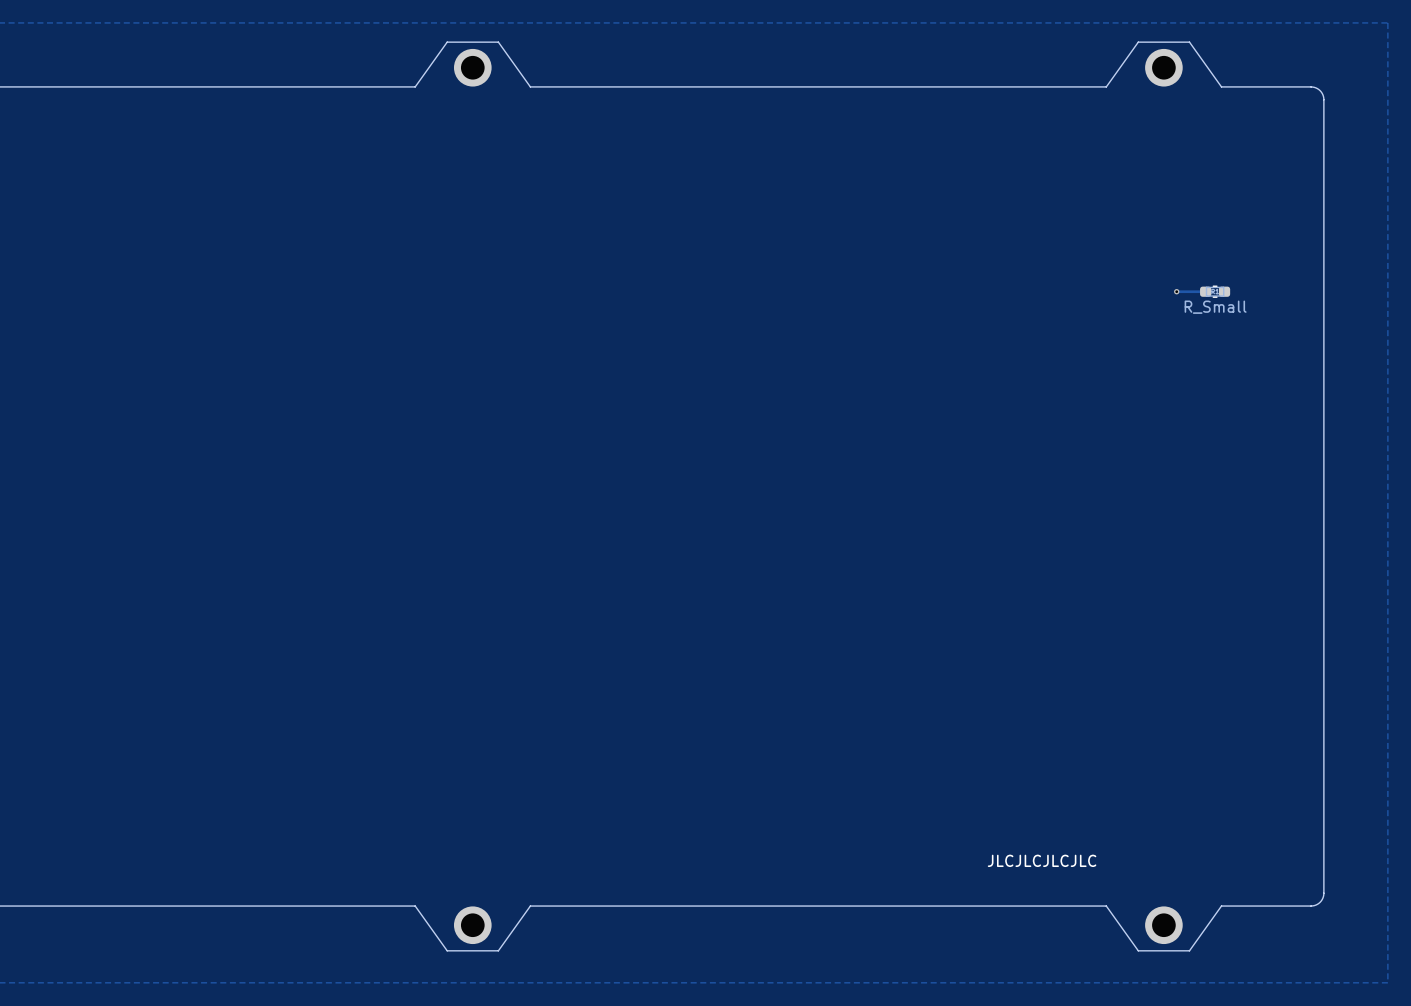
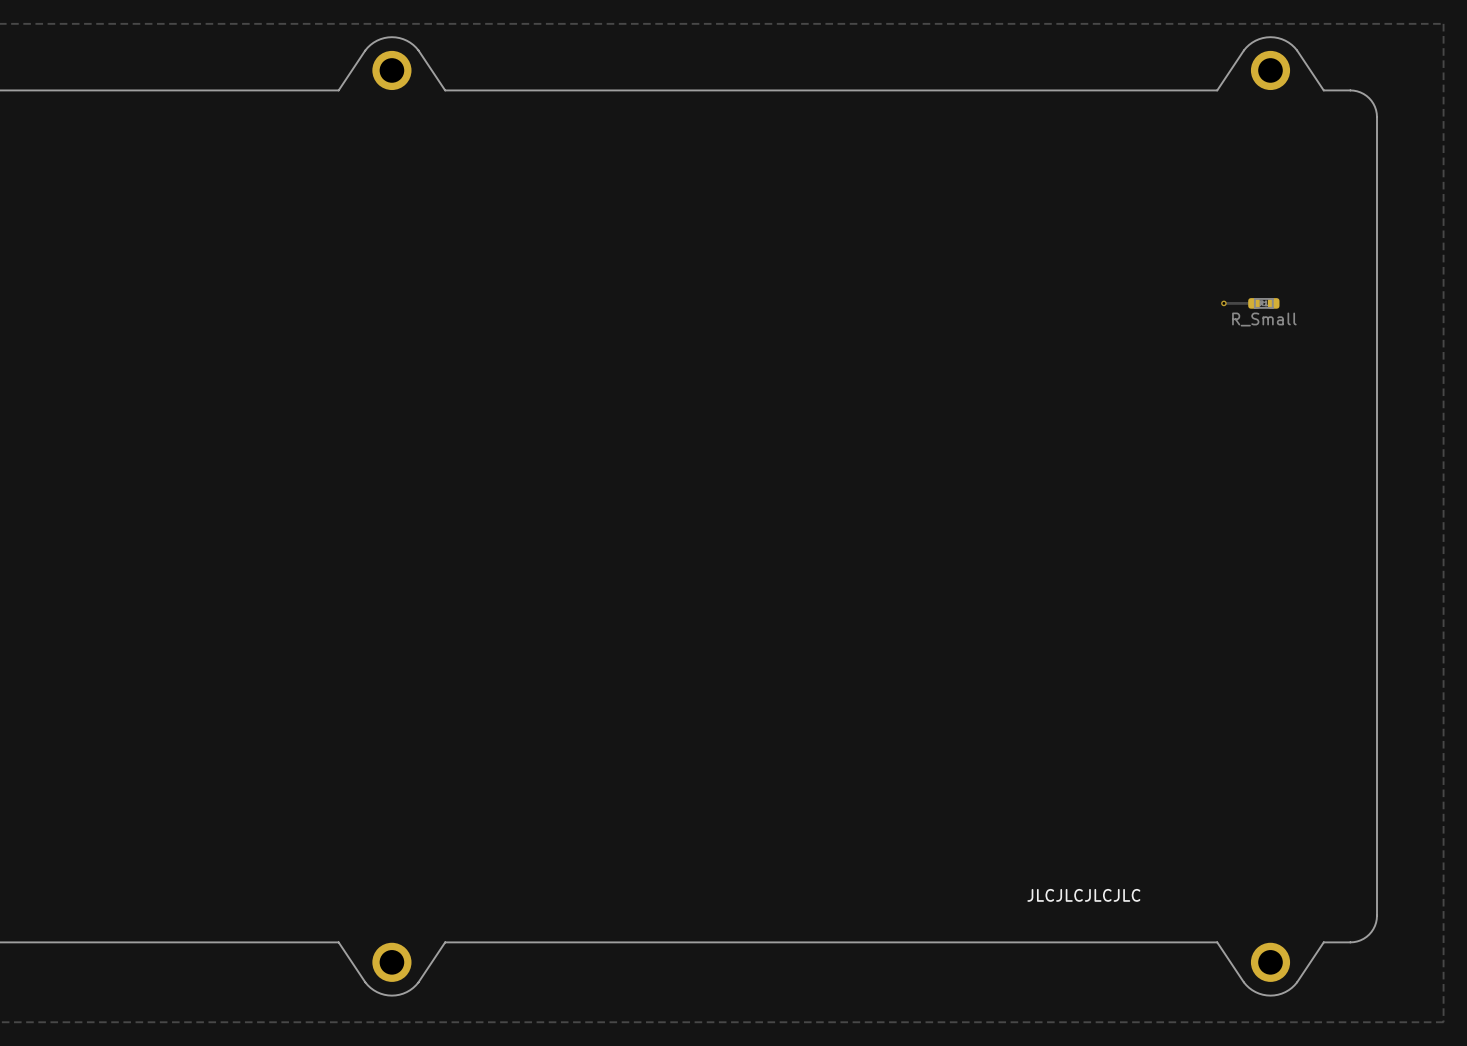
part position: (472, 67) -> (391, 70)
part position: (1163, 67) -> (1270, 70)
board edge: (325, 86) (415, 86) (447, 42) (498, 42) (530, 86) -> (338, 90) (367, 47) (377, 40) (391, 37) (403, 39) (416, 47) (445, 90) (551, 90)
board edge: (1106, 86) (1138, 42) (1189, 42) (1221, 86) (1314, 87) (1322, 94) (1323, 112) -> (1150, 90) (1217, 90) (1249, 44) (1259, 39) (1274, 37) (1285, 40) (1294, 47) (1323, 90) (1353, 90) (1363, 93) (1373, 103) (1377, 117)
part footprint: [1200, 285, 1231, 298] -> [1248, 298, 1280, 309]
board edge: (1323, 880) (1322, 898) (1314, 905) (1221, 906) (1189, 950) (1138, 950) (1106, 906) -> (1377, 915) (1373, 929) (1363, 938) (1353, 942) (1323, 942) (1294, 985) (1285, 992) (1274, 995) (1262, 994) (1249, 987) (1217, 942) (1150, 942)
board edge: (325, 906) (415, 906) (447, 950) (498, 950) (530, 906) -> (338, 942) (367, 985) (377, 992) (391, 995) (406, 992) (416, 985) (445, 942) (551, 942)
part position: (472, 925) -> (391, 962)
part position: (1163, 925) -> (1270, 962)

